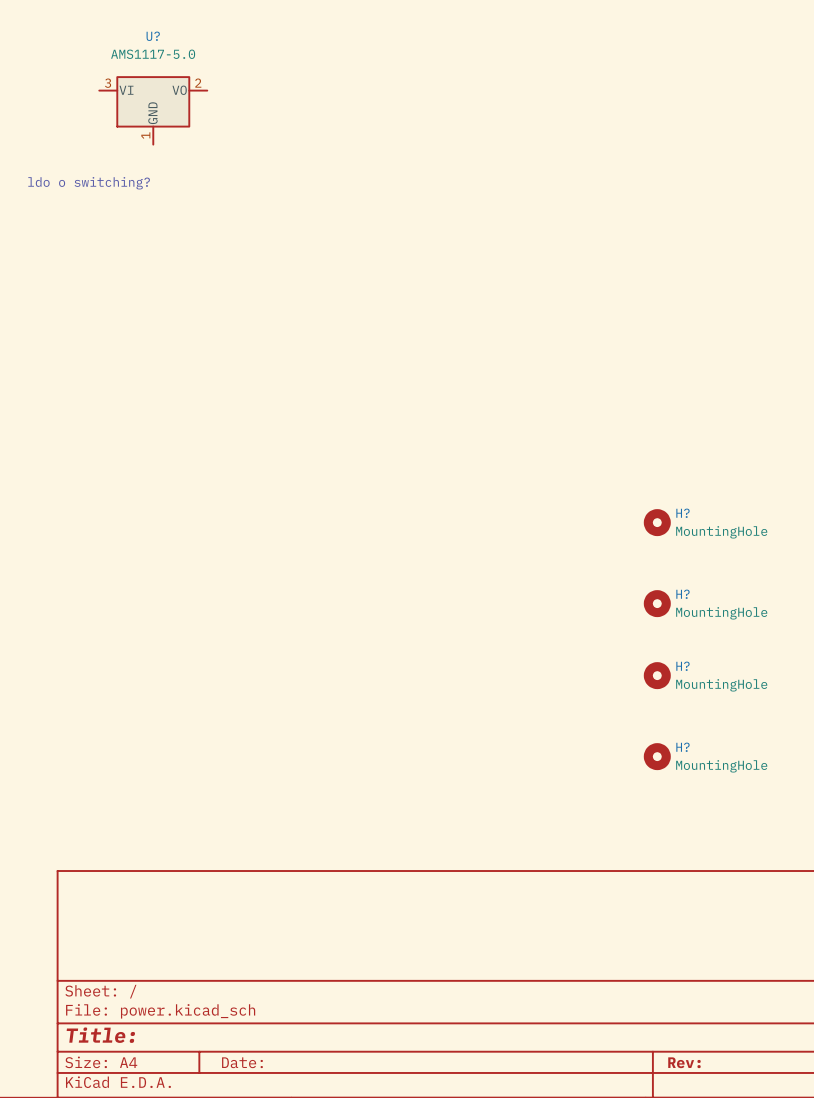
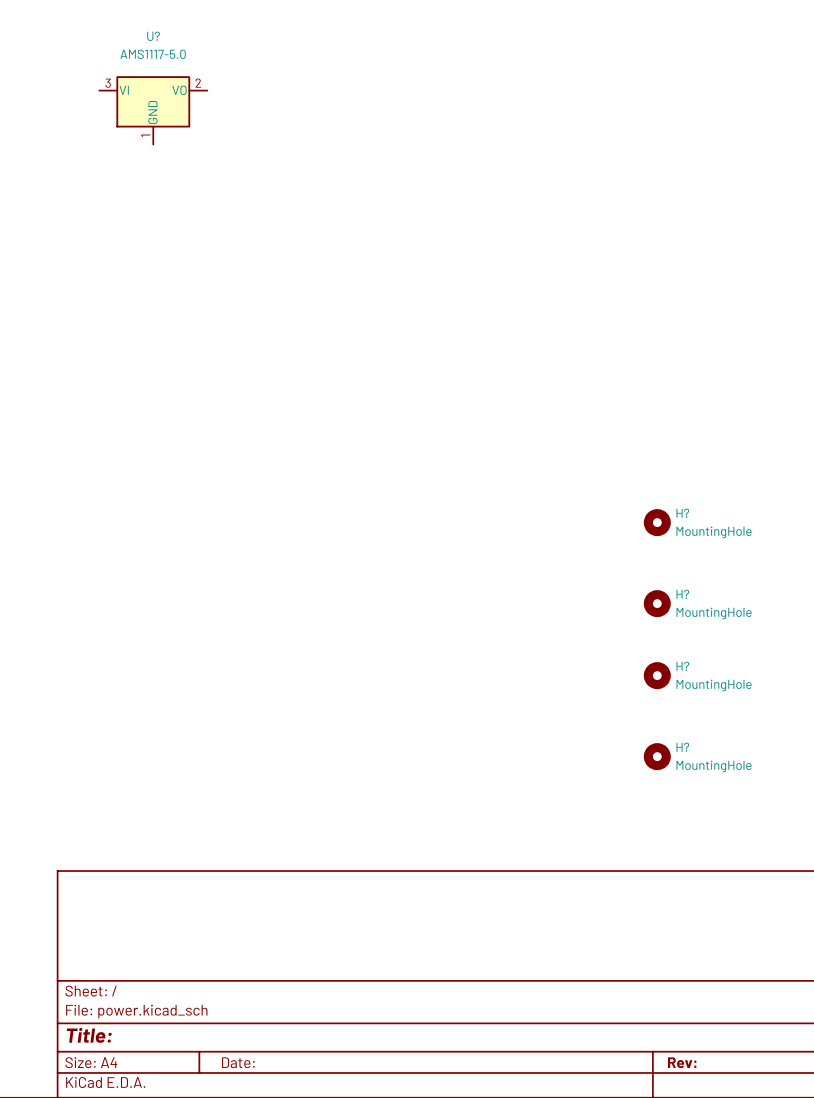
text: ldo o switching? (89, 183) -> none

